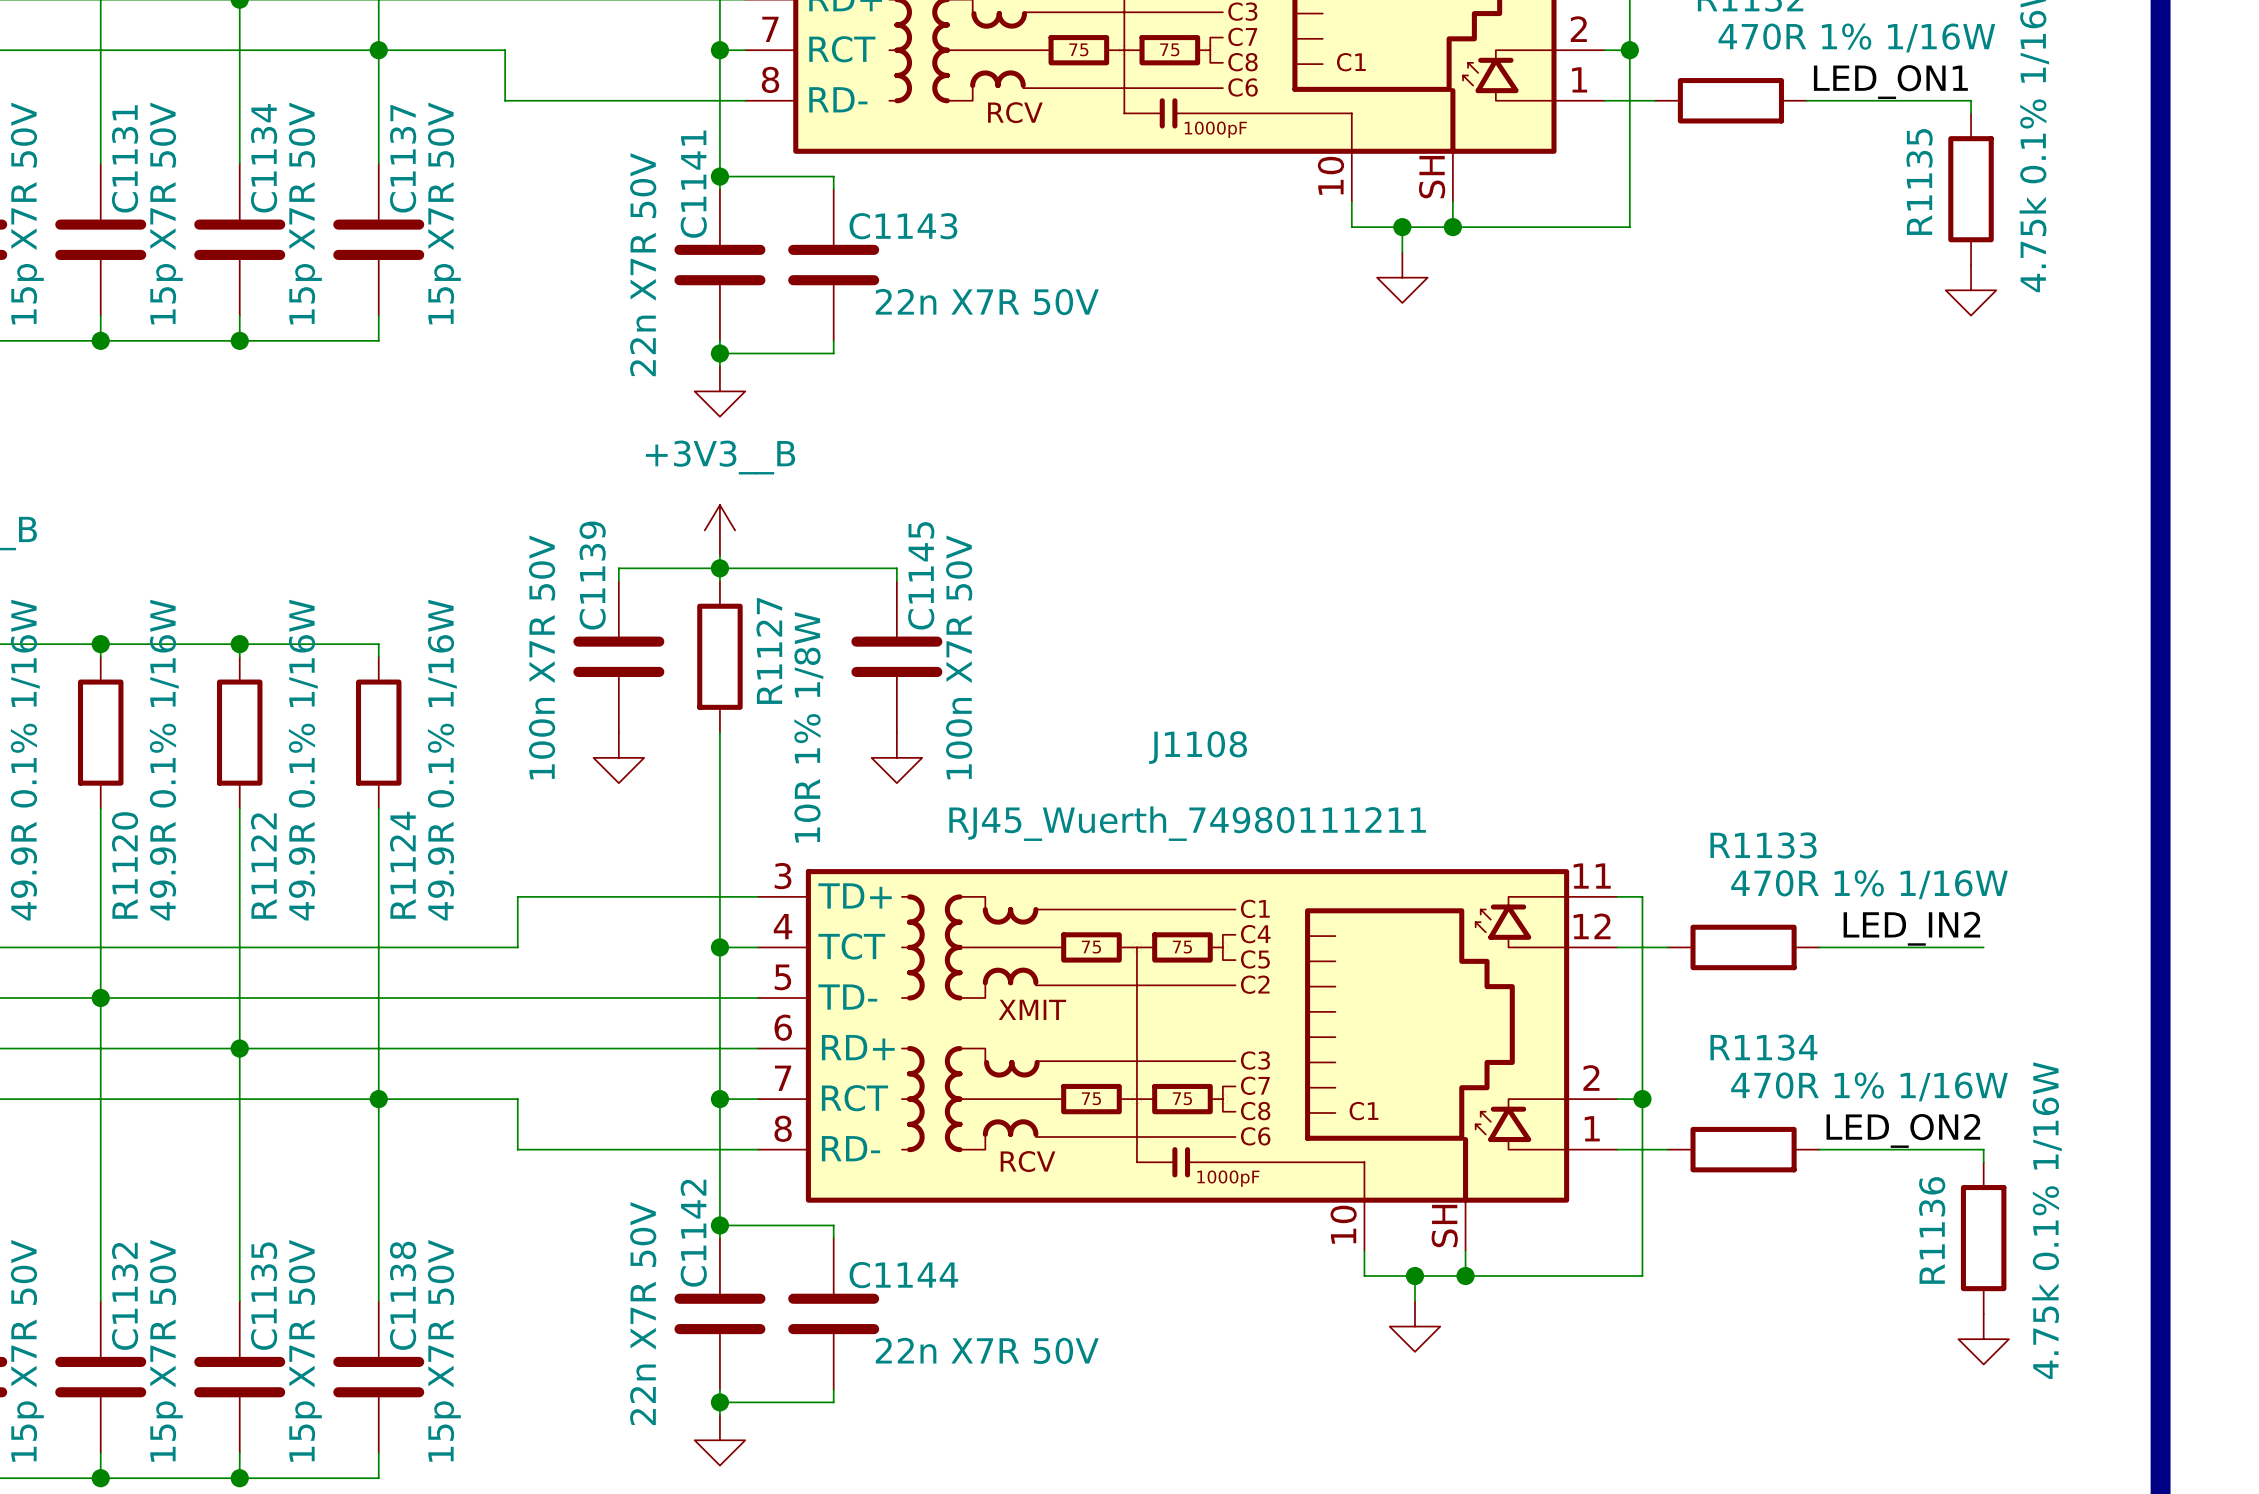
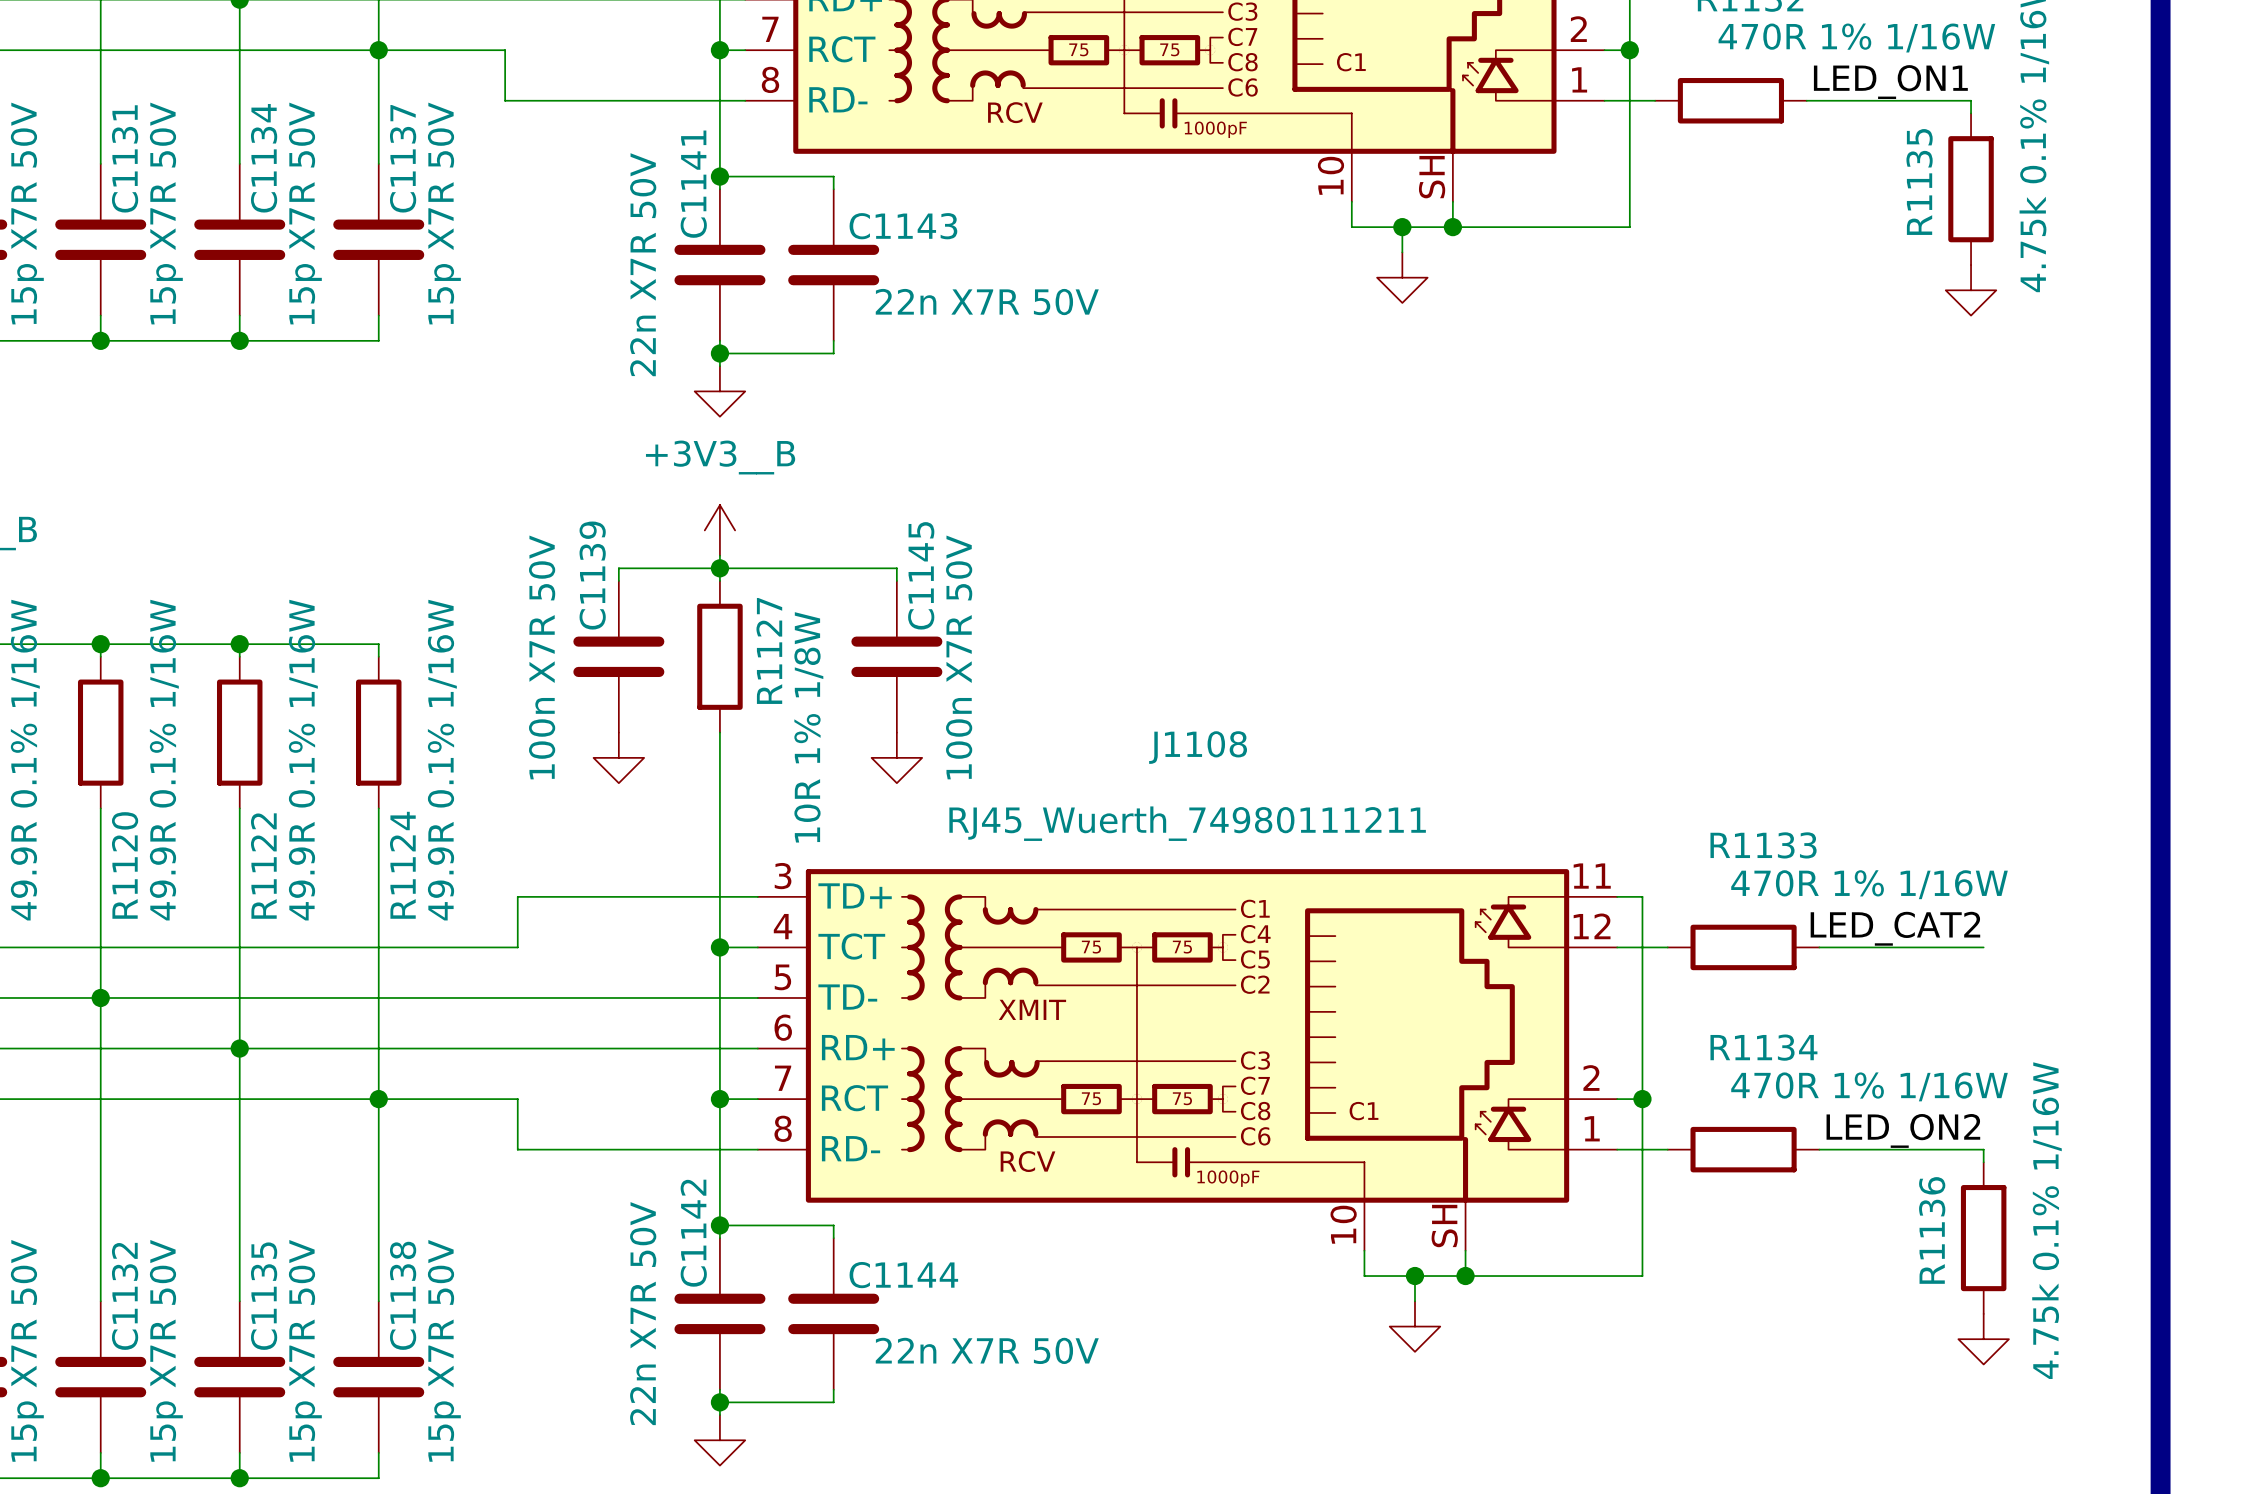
label: LED_IN2 (1911, 928) -> LED_CAT2 (1895, 928)

